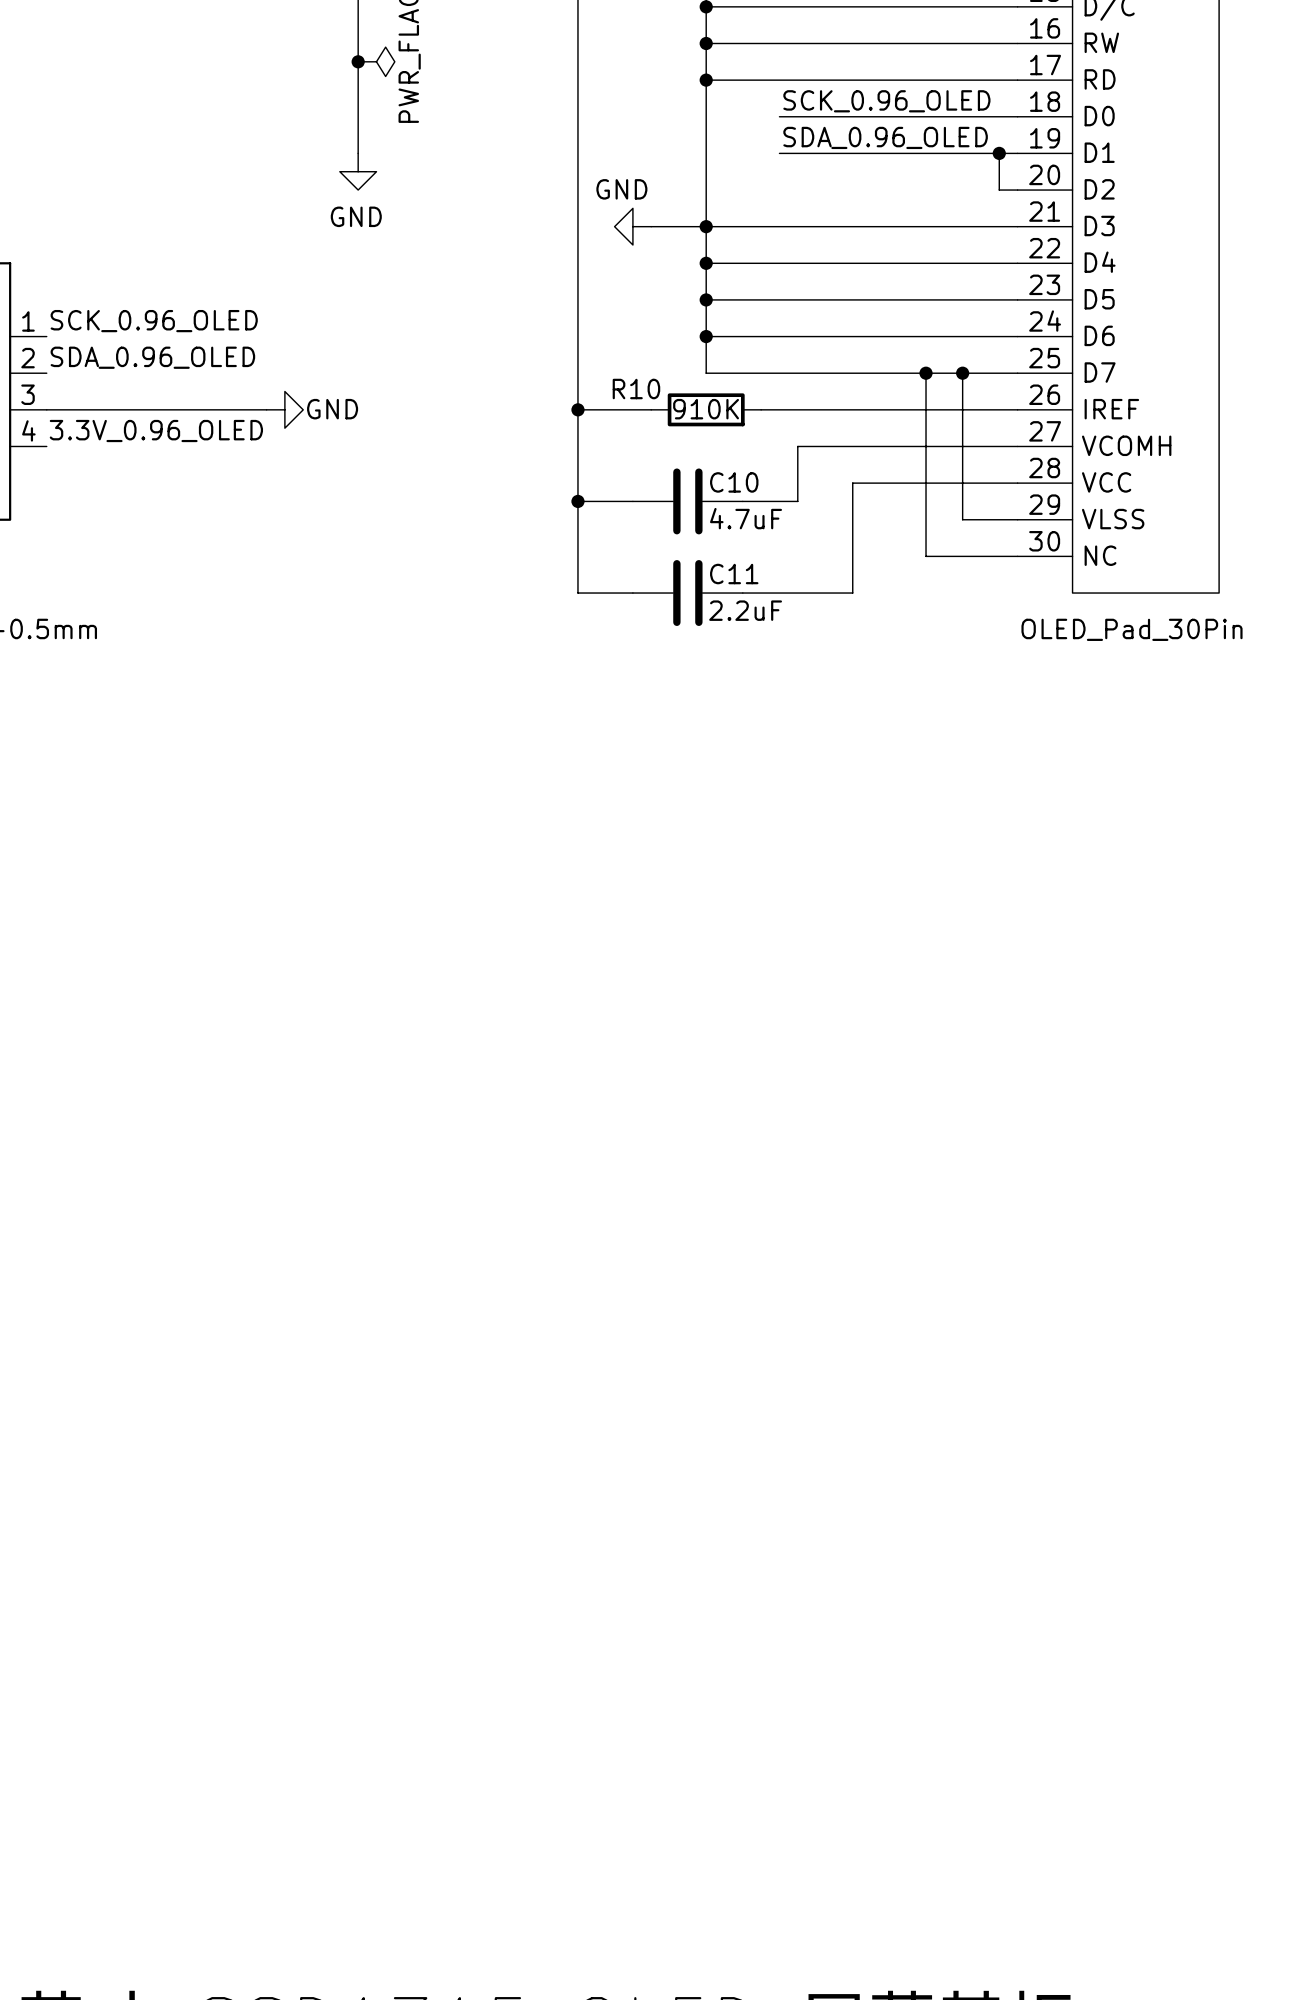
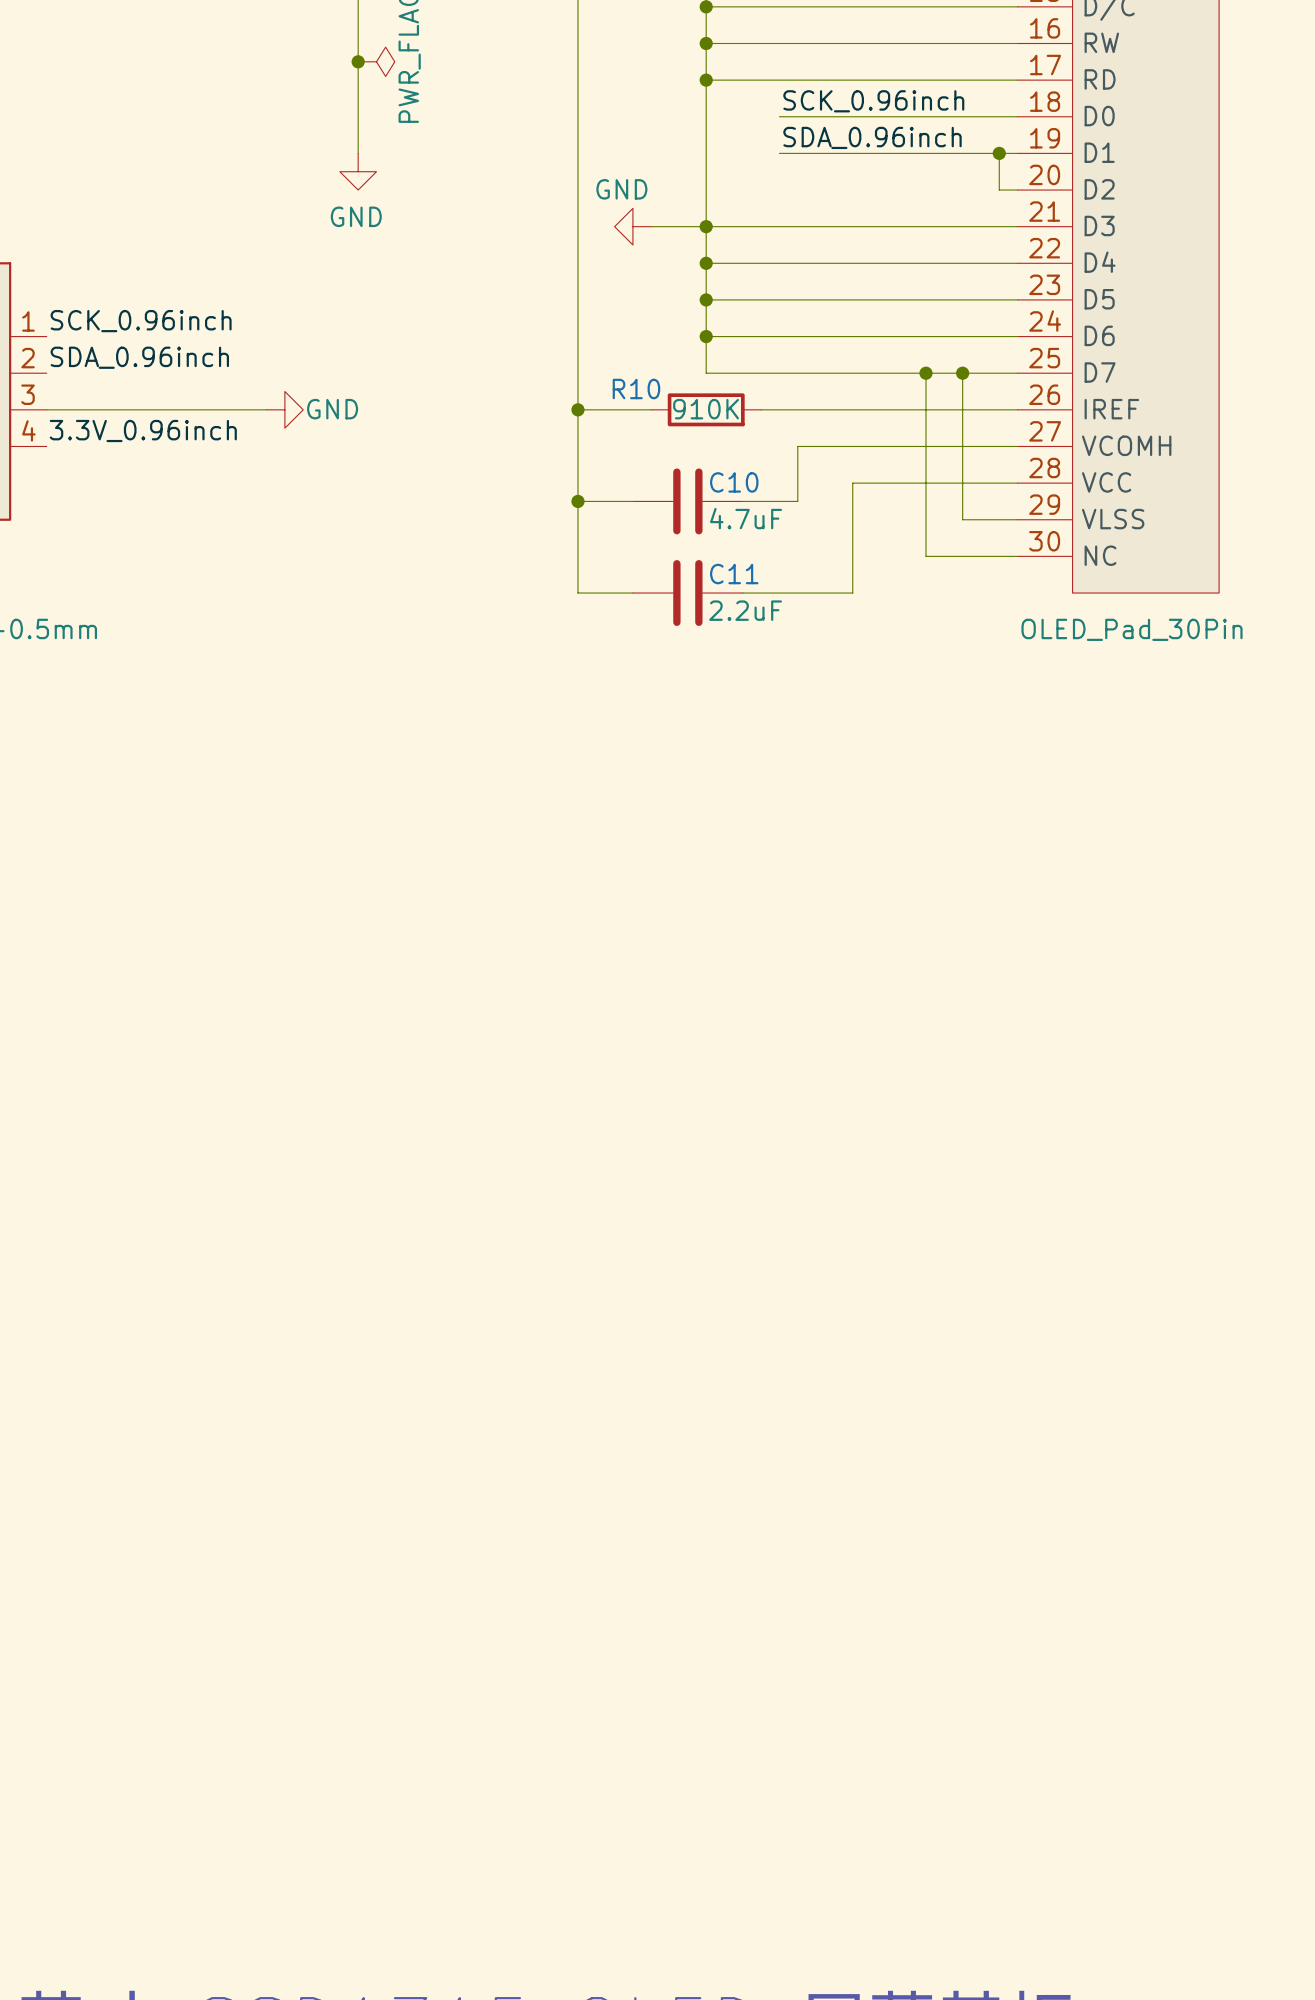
label: SCK_0.96_OLED (886, 101) -> SCK_0.96inch (873, 101)
label: SDA_0.96_OLED (885, 137) -> SDA_0.96inch (872, 137)
label: SCK_0.96_OLED (154, 321) -> SCK_0.96inch (141, 321)
label: SDA_0.96_OLED (152, 357) -> SDA_0.96inch (139, 357)
label: 3.3V_0.96_OLED (156, 431) -> 3.3V_0.96inch (143, 431)

